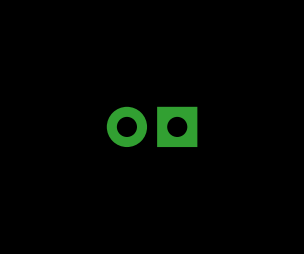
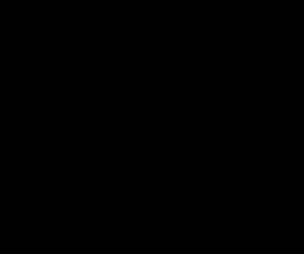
part: (152, 126) -> none

